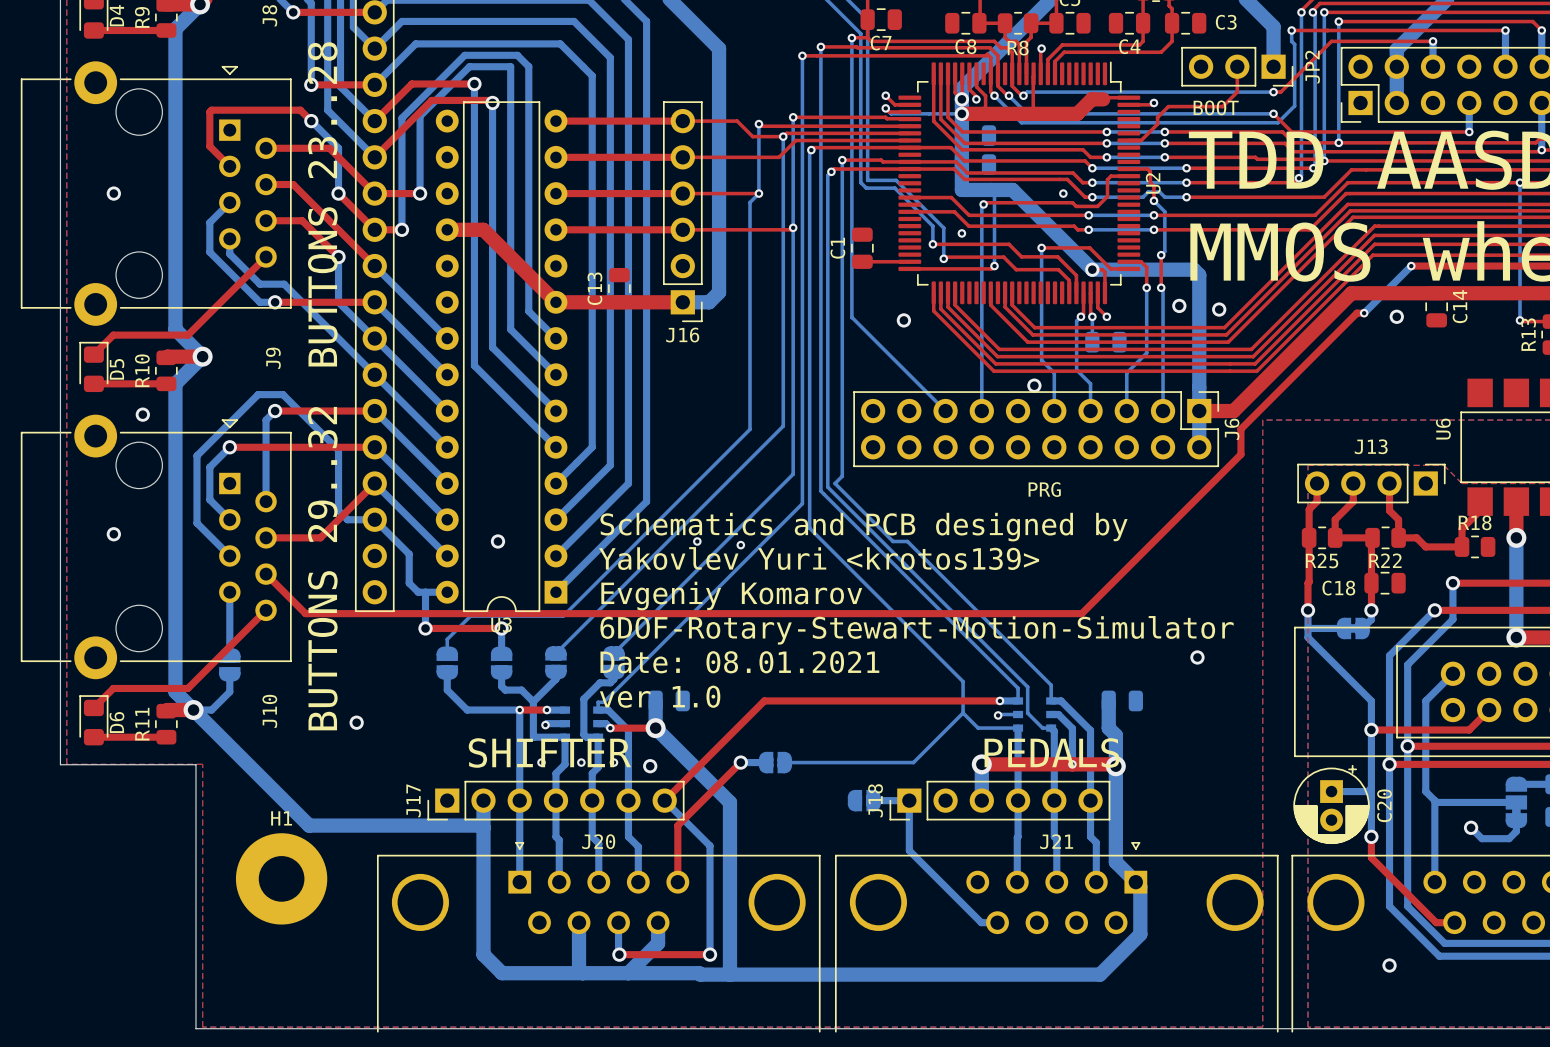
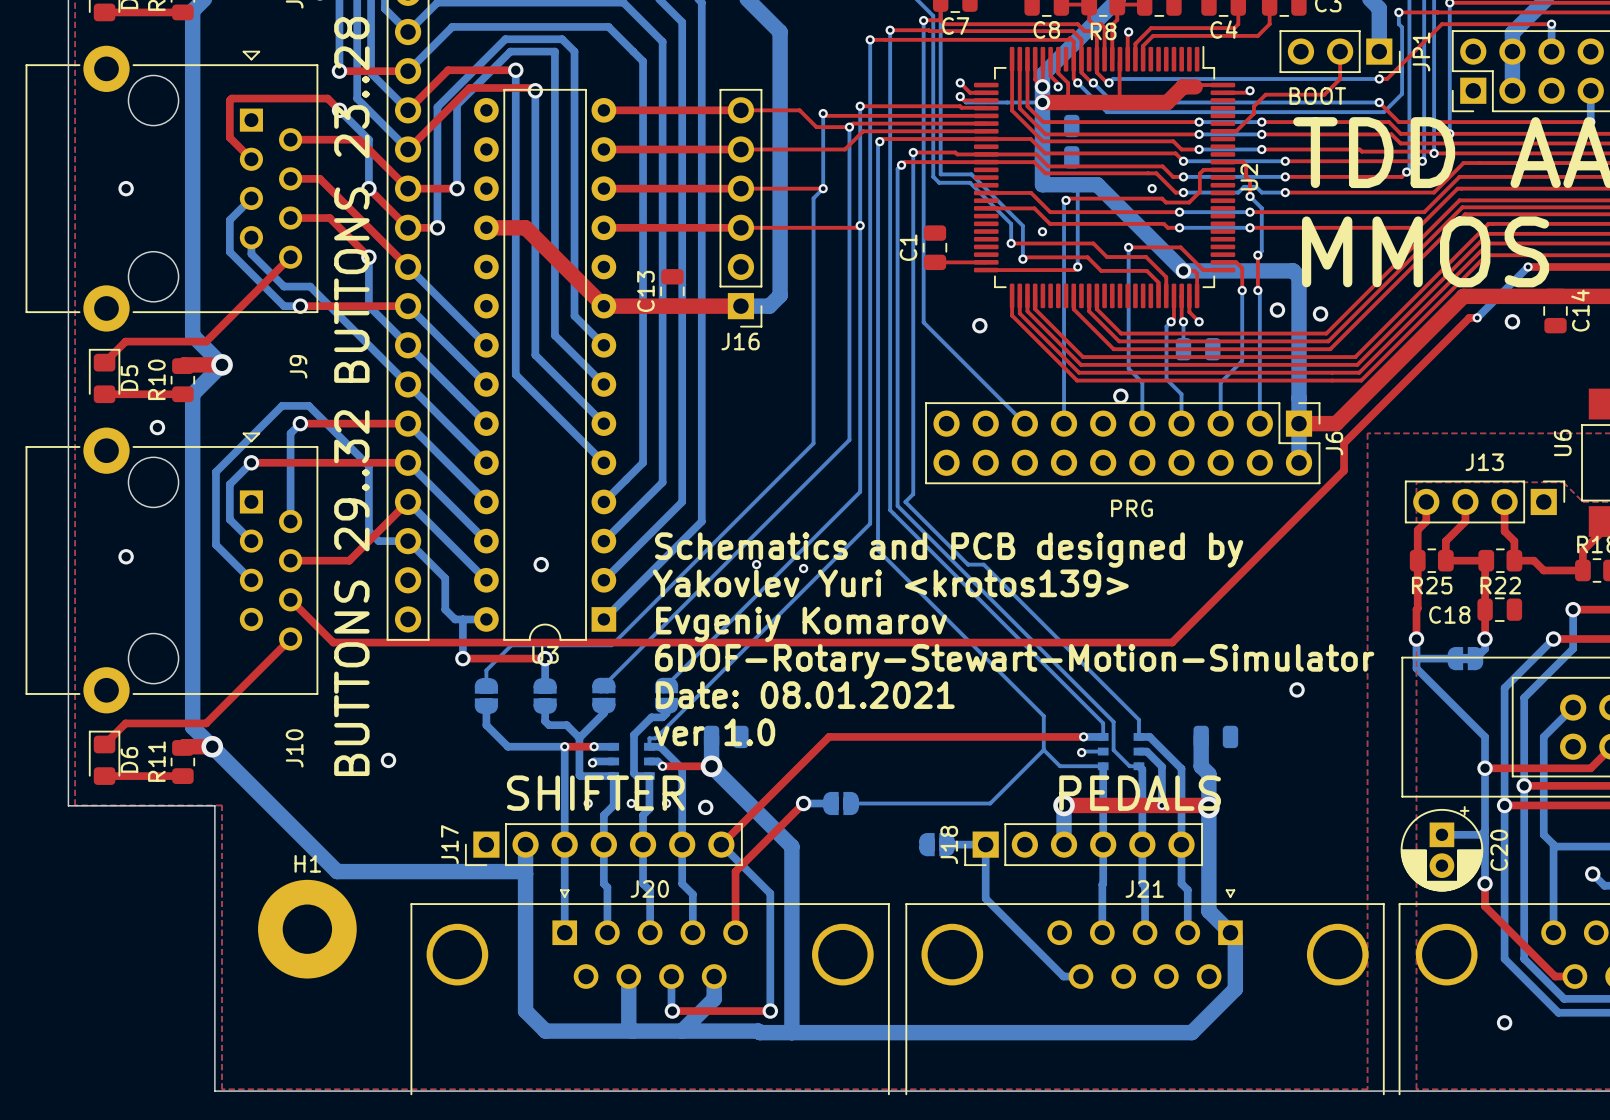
JP2 name: JP2 (1312, 67) -> JP1 (1421, 51)
bottom track: (229, 592) (229, 655) -> none
part: (229, 664) -> none
bottom track: (229, 674) (229, 691) (211, 710) (193, 710) -> none

